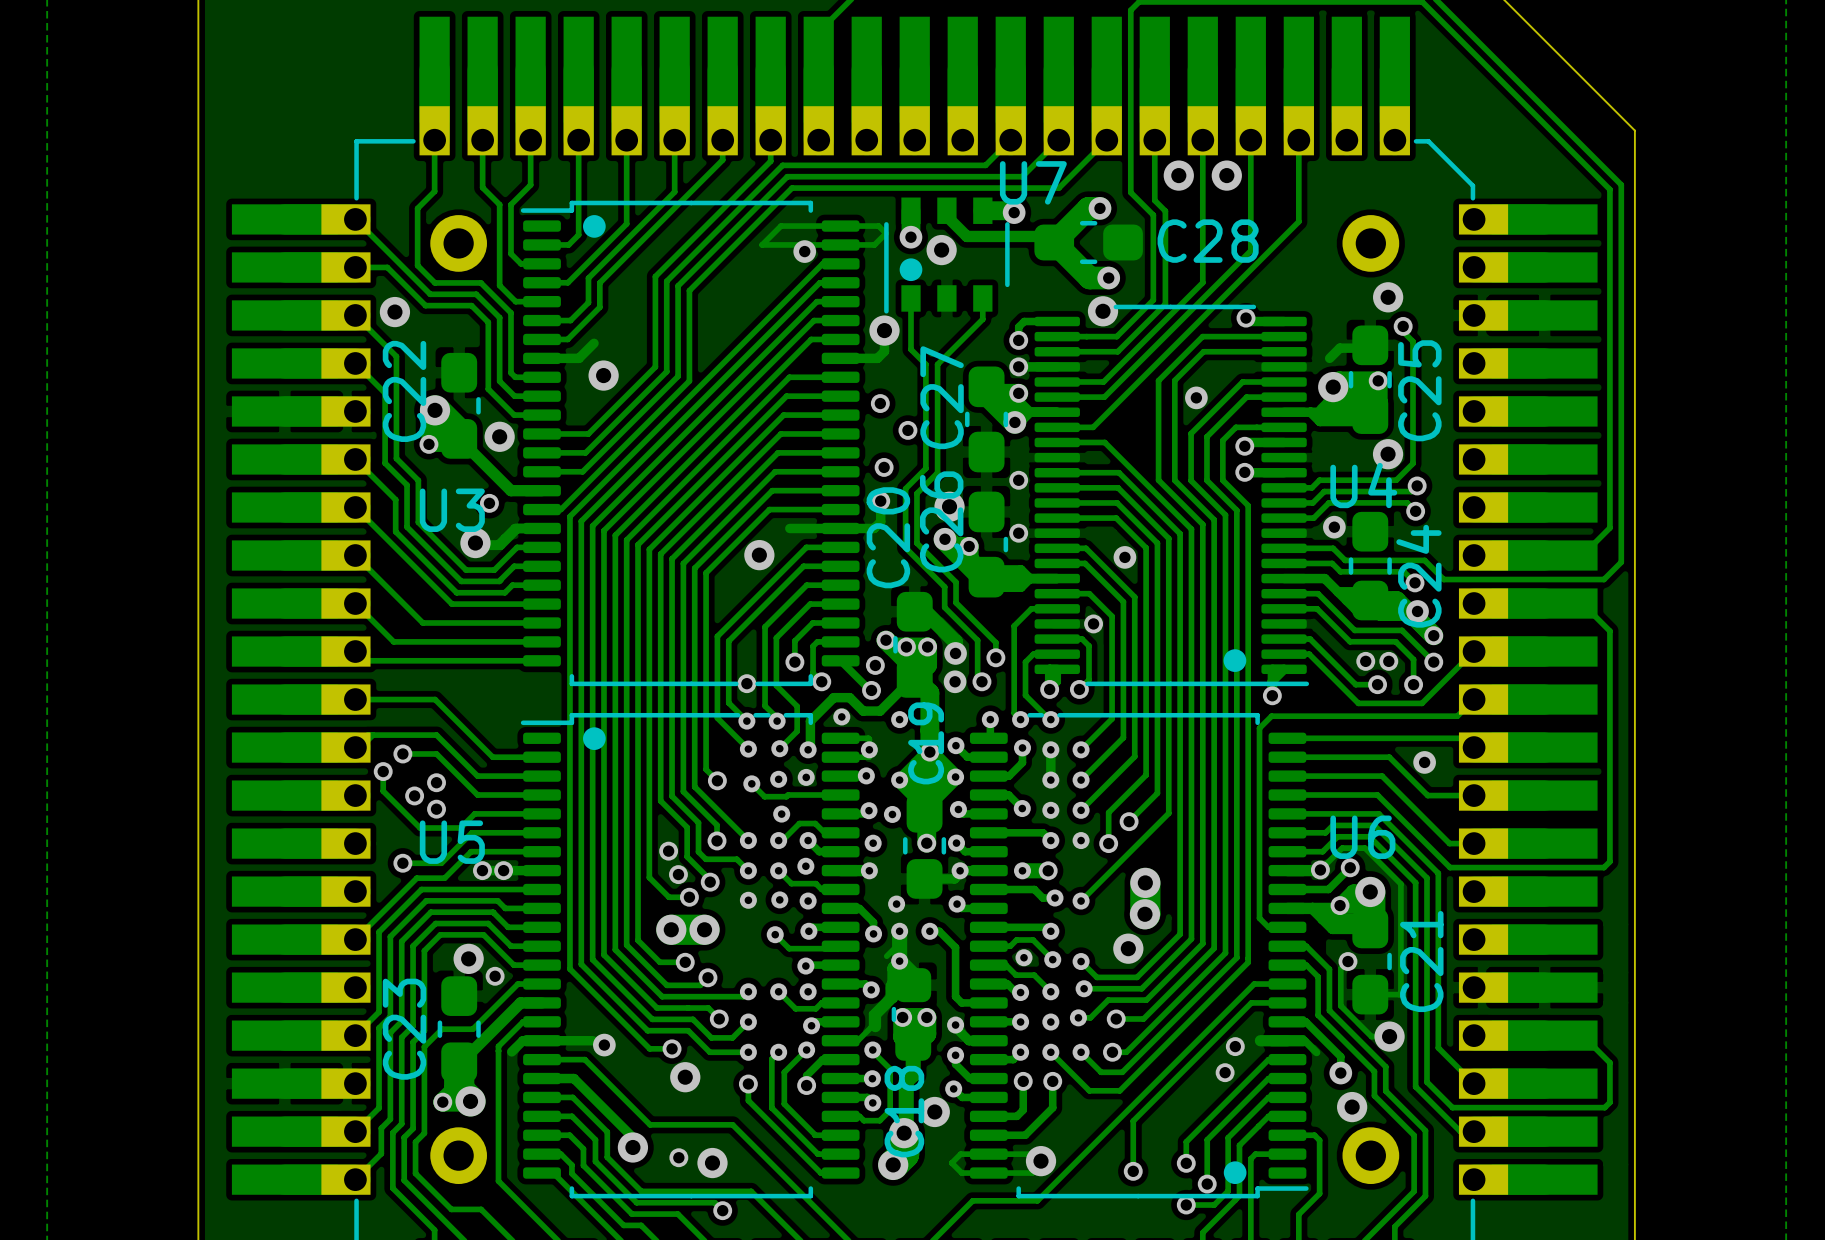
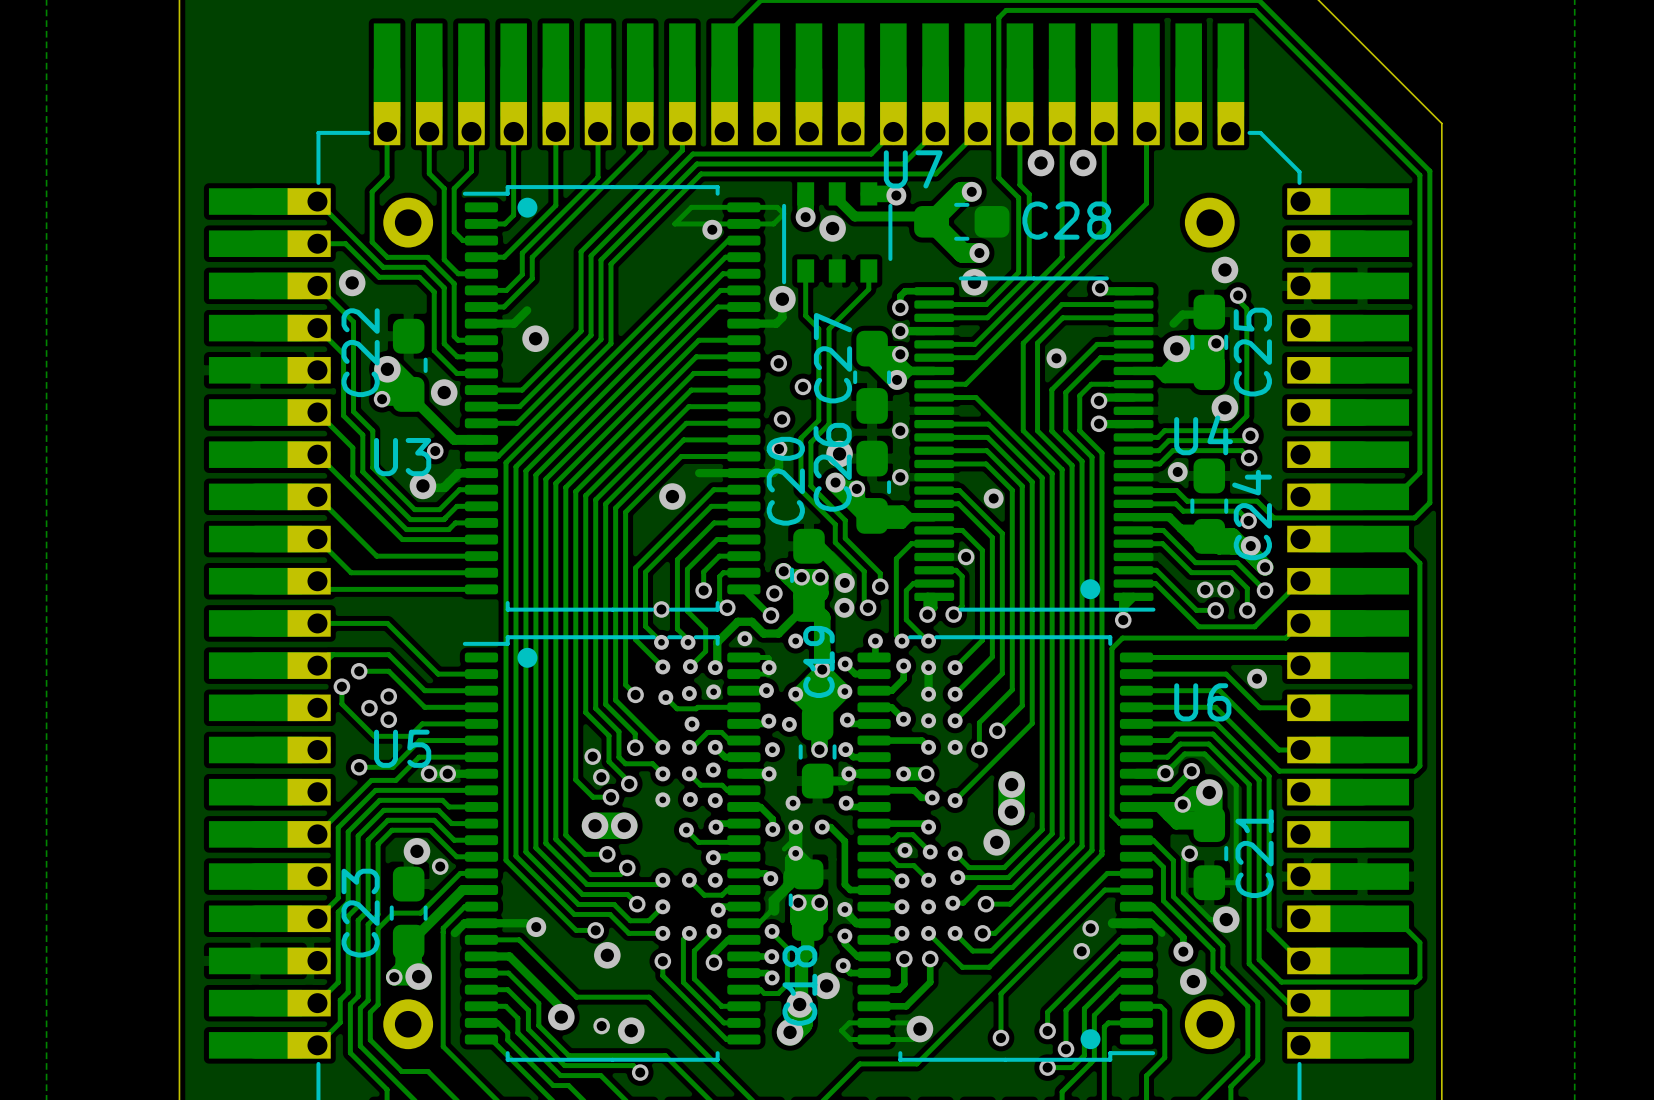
U7 footprint: [884, 197, 1010, 314] -> [782, 182, 893, 285]
U4 footprint: [1034, 304, 1310, 687] -> [914, 276, 1156, 612]
U6 name position: U6 (1362, 837) -> U6 (1202, 702)

